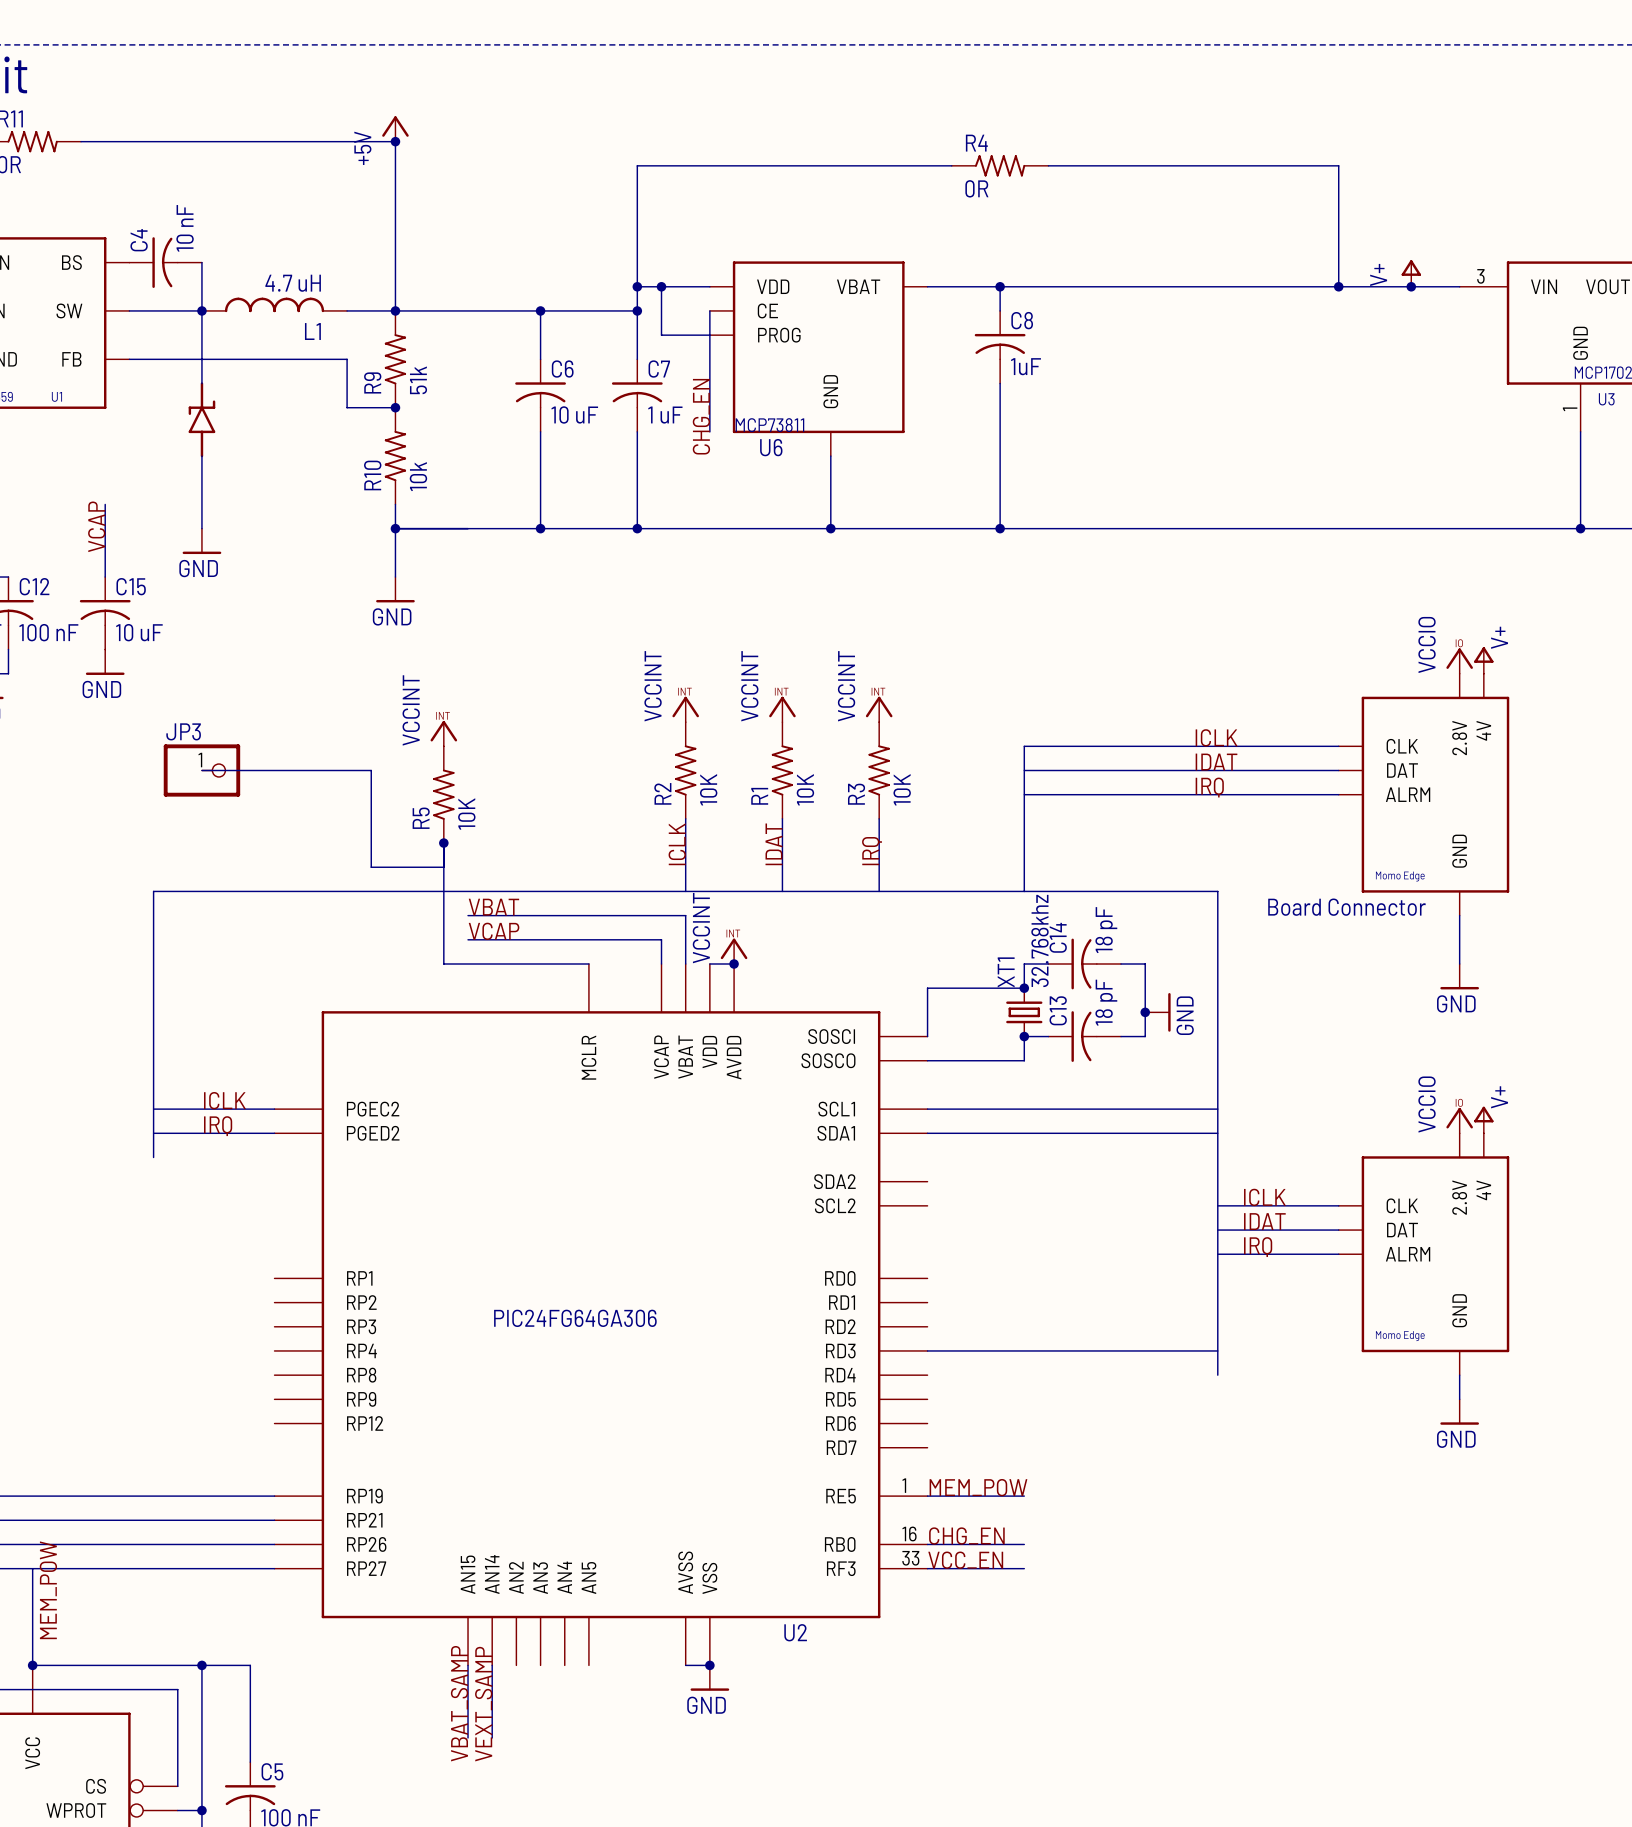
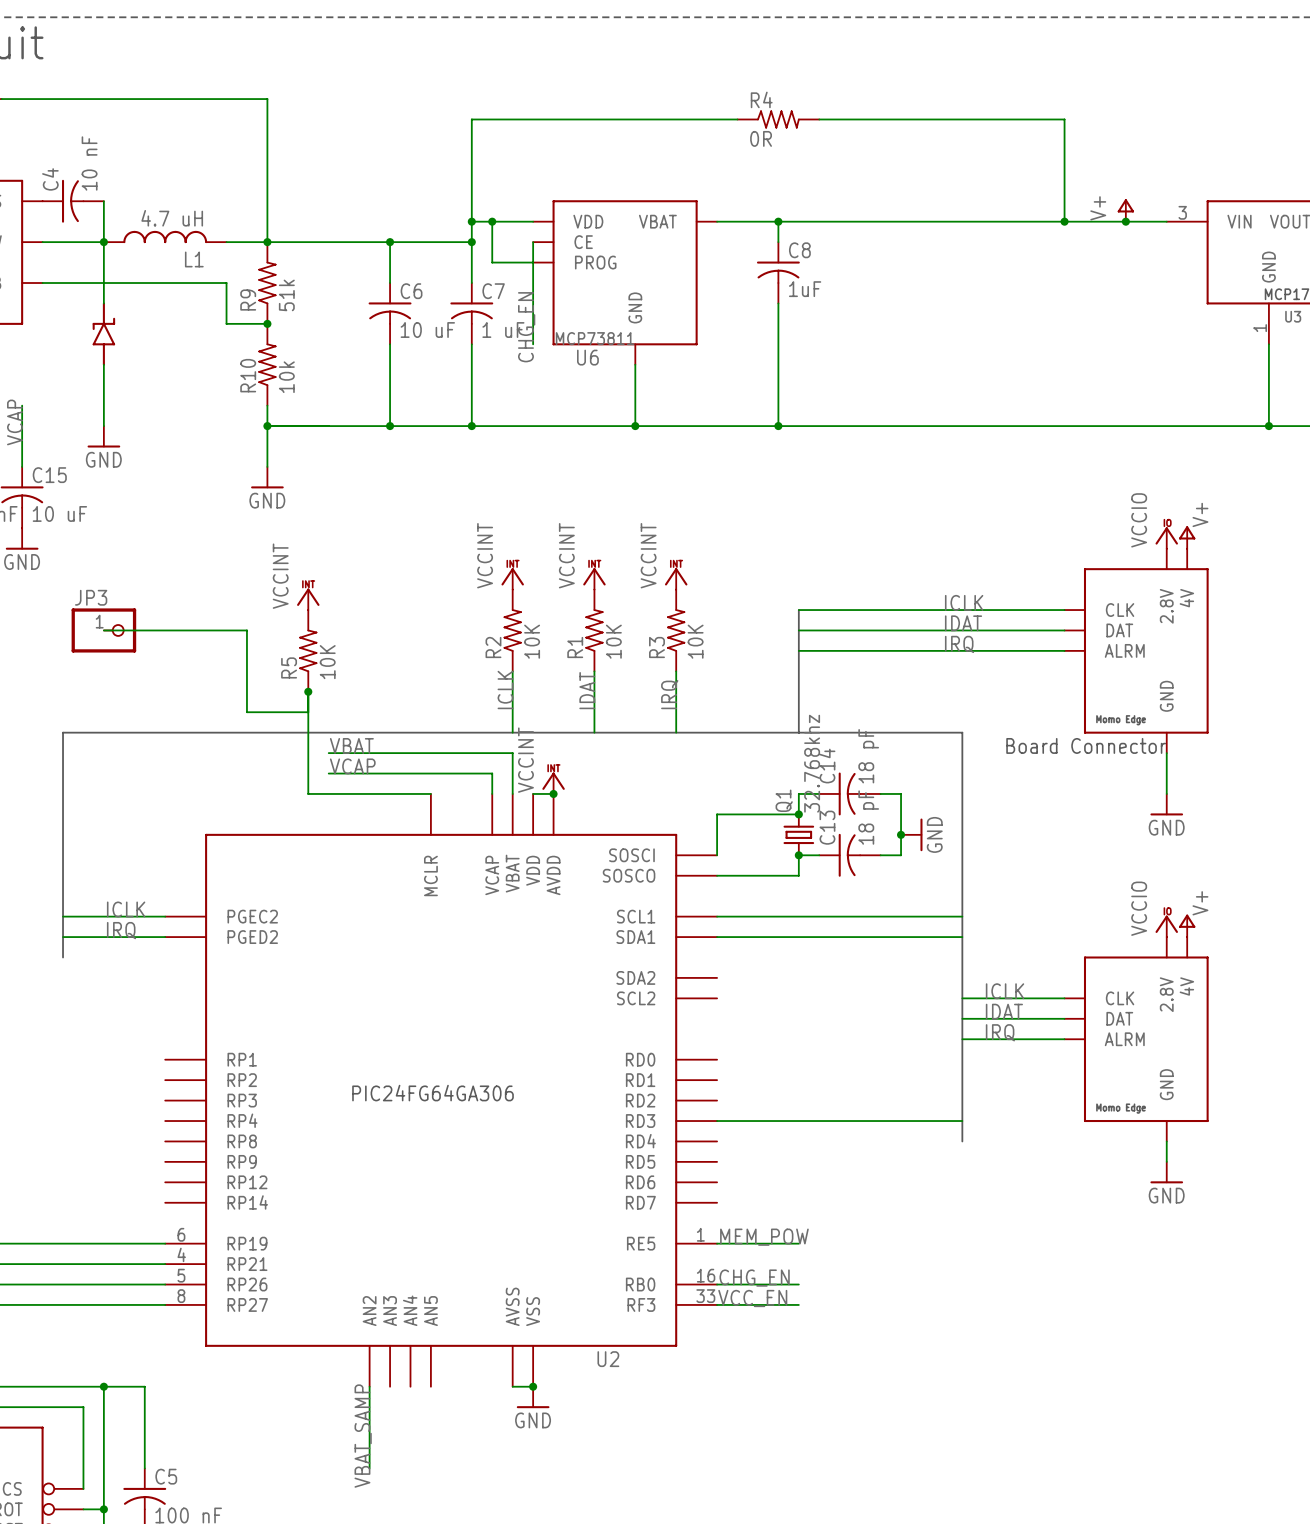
power symbol: +5V (395, 128) -> none
junction: (395, 141) -> none
U2 symbol: [274, 963, 928, 1666] -> [165, 793, 718, 1387]
XT1 name: XT1 (1006, 972) -> Q1 (784, 800)
wire: (468, 1665) (468, 1737) -> none
wire: (492, 1665) (492, 1737) -> none
wire: none -> (369, 1386) (369, 1468)
label position: VBAT_SAMP (459, 1703) -> VBAT_SAMP (363, 1436)
label: VEXT_SAMP (483, 1704) -> none

